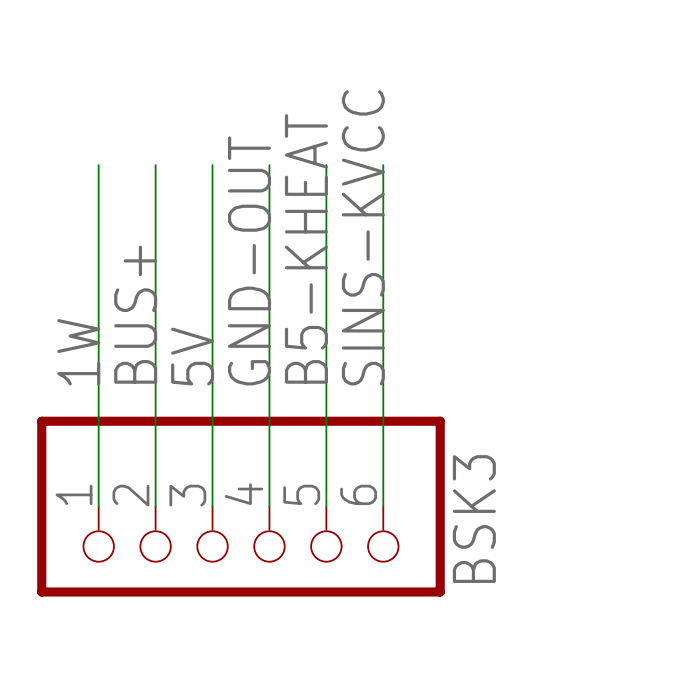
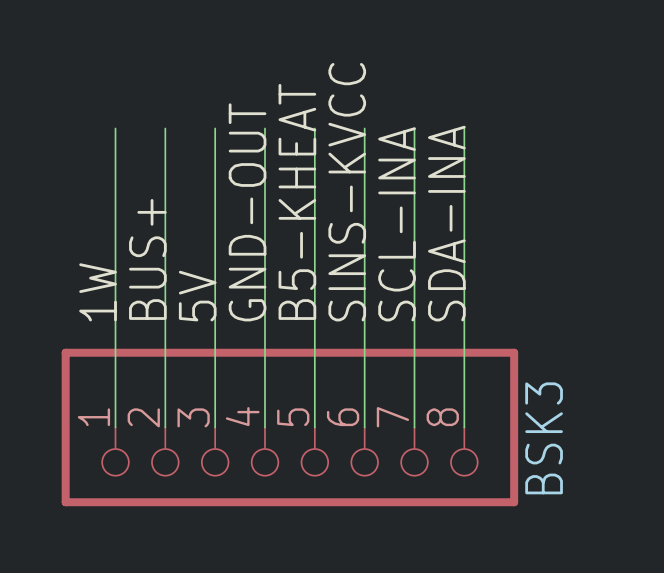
wire: none -> (414, 128) (414, 427)
wire: none -> (464, 128) (464, 427)
label: none -> SDA-INA (446, 223)
label: none -> SCL-INA (397, 224)
BSK3 symbol: [37, 416, 445, 597] -> [61, 348, 519, 507]
BSK3 name position: BSK3 (474, 519) -> BSK3 (544, 438)

